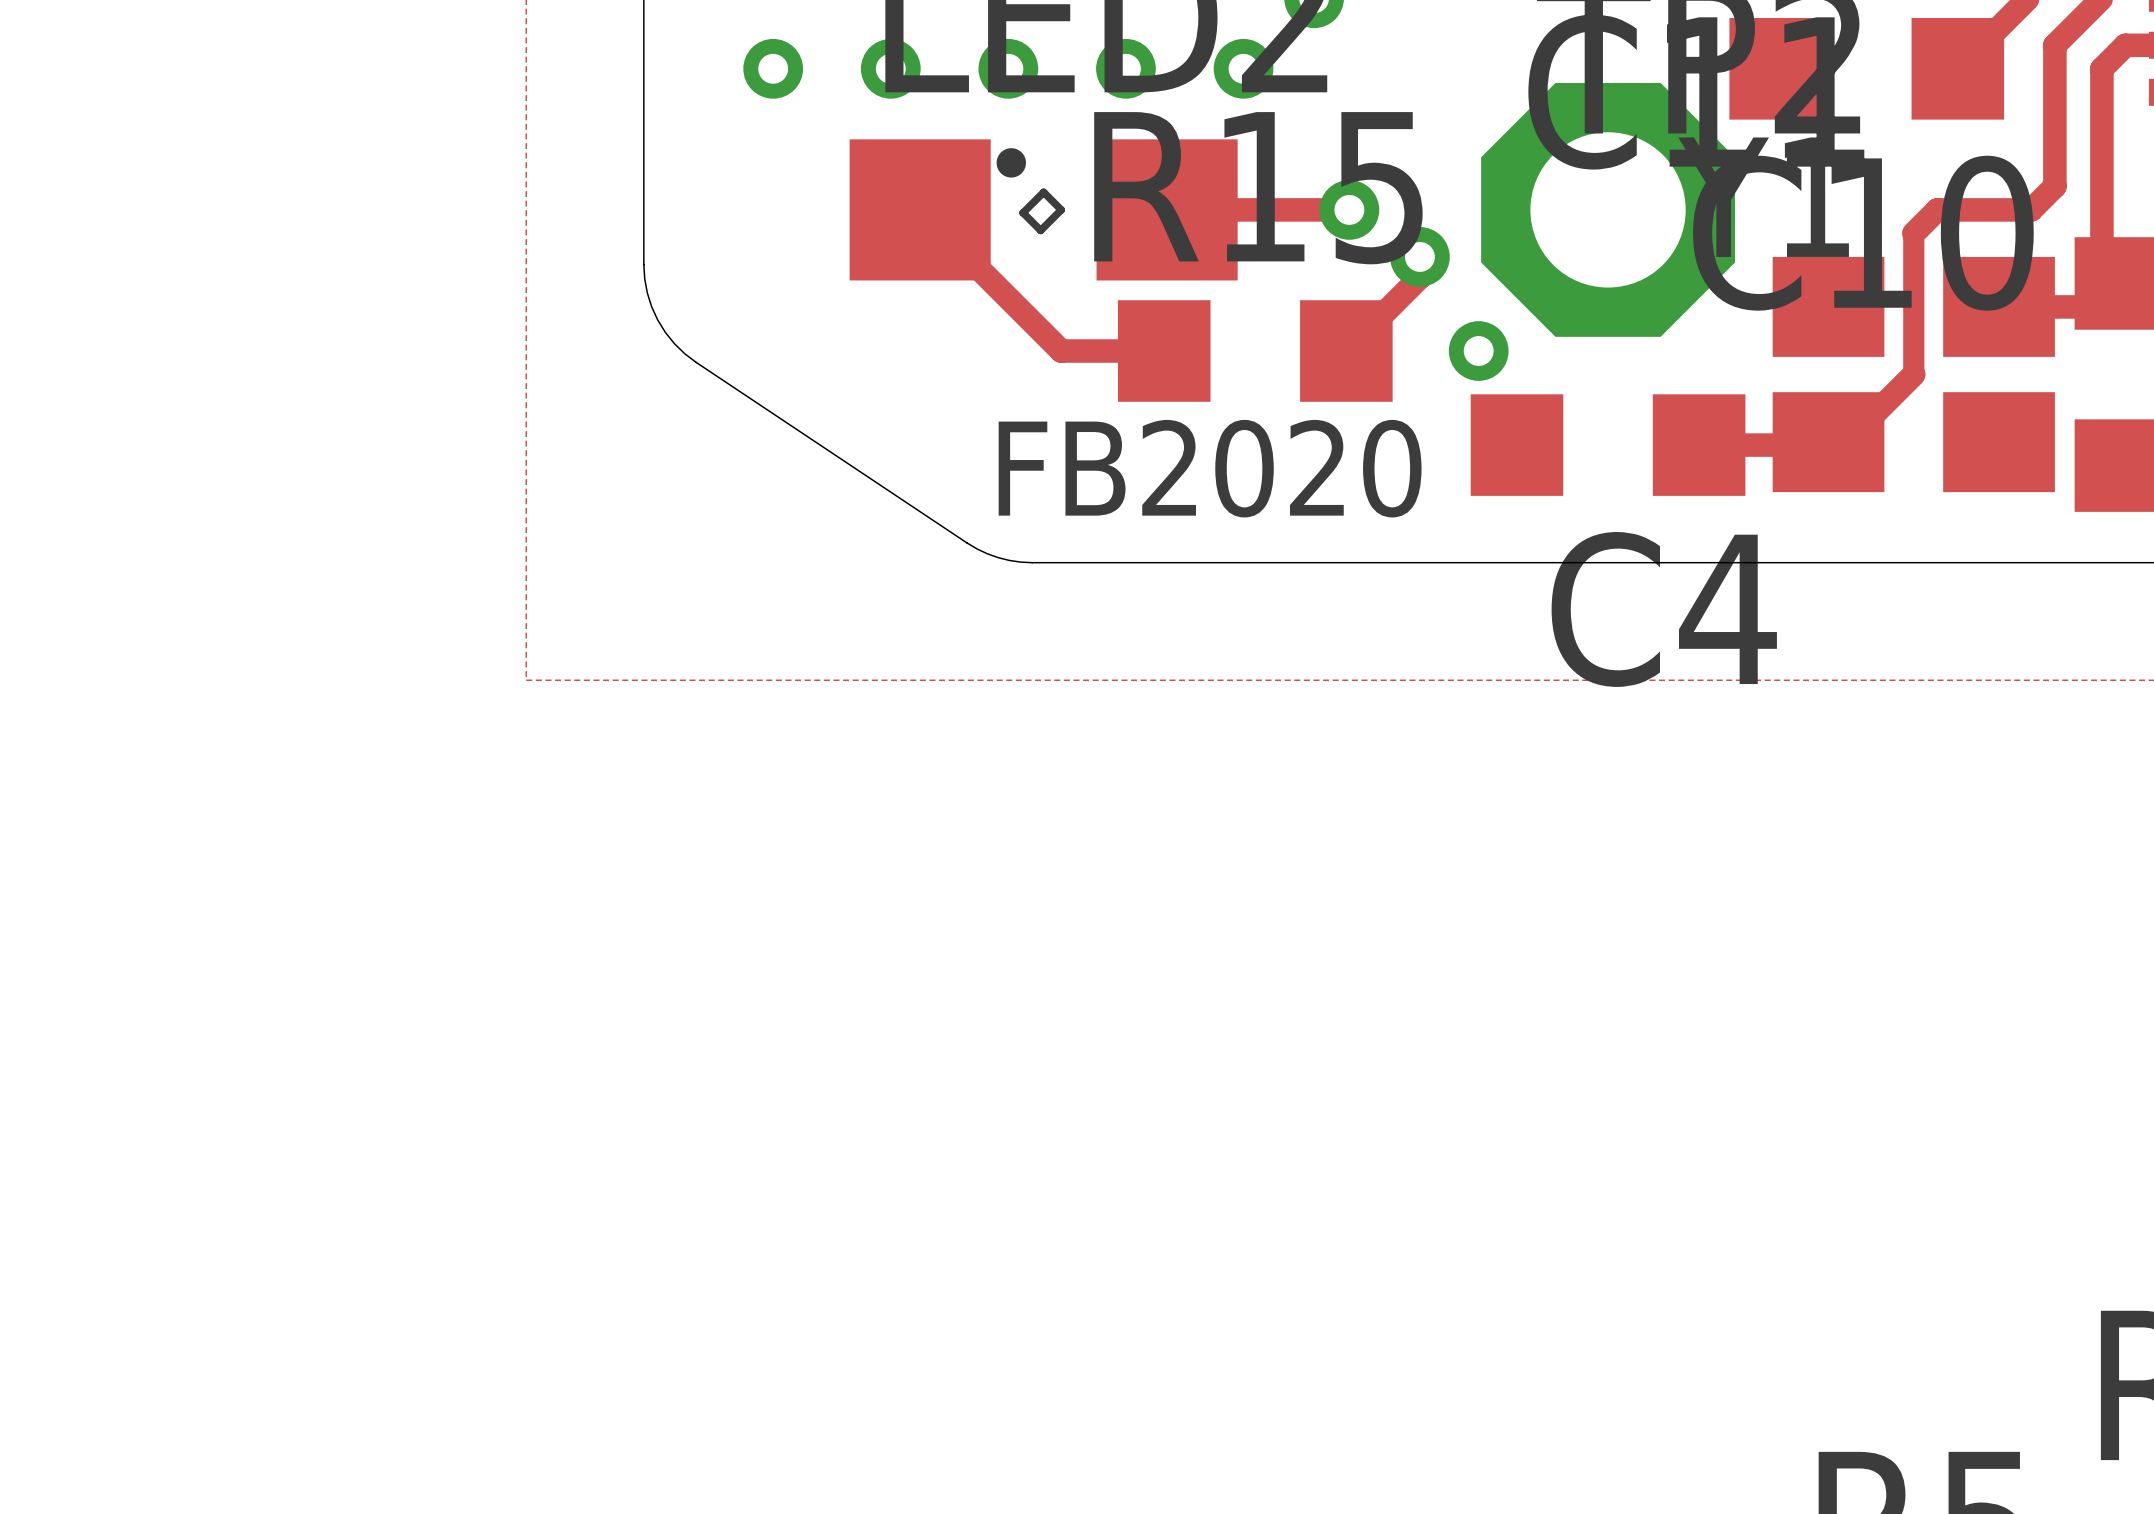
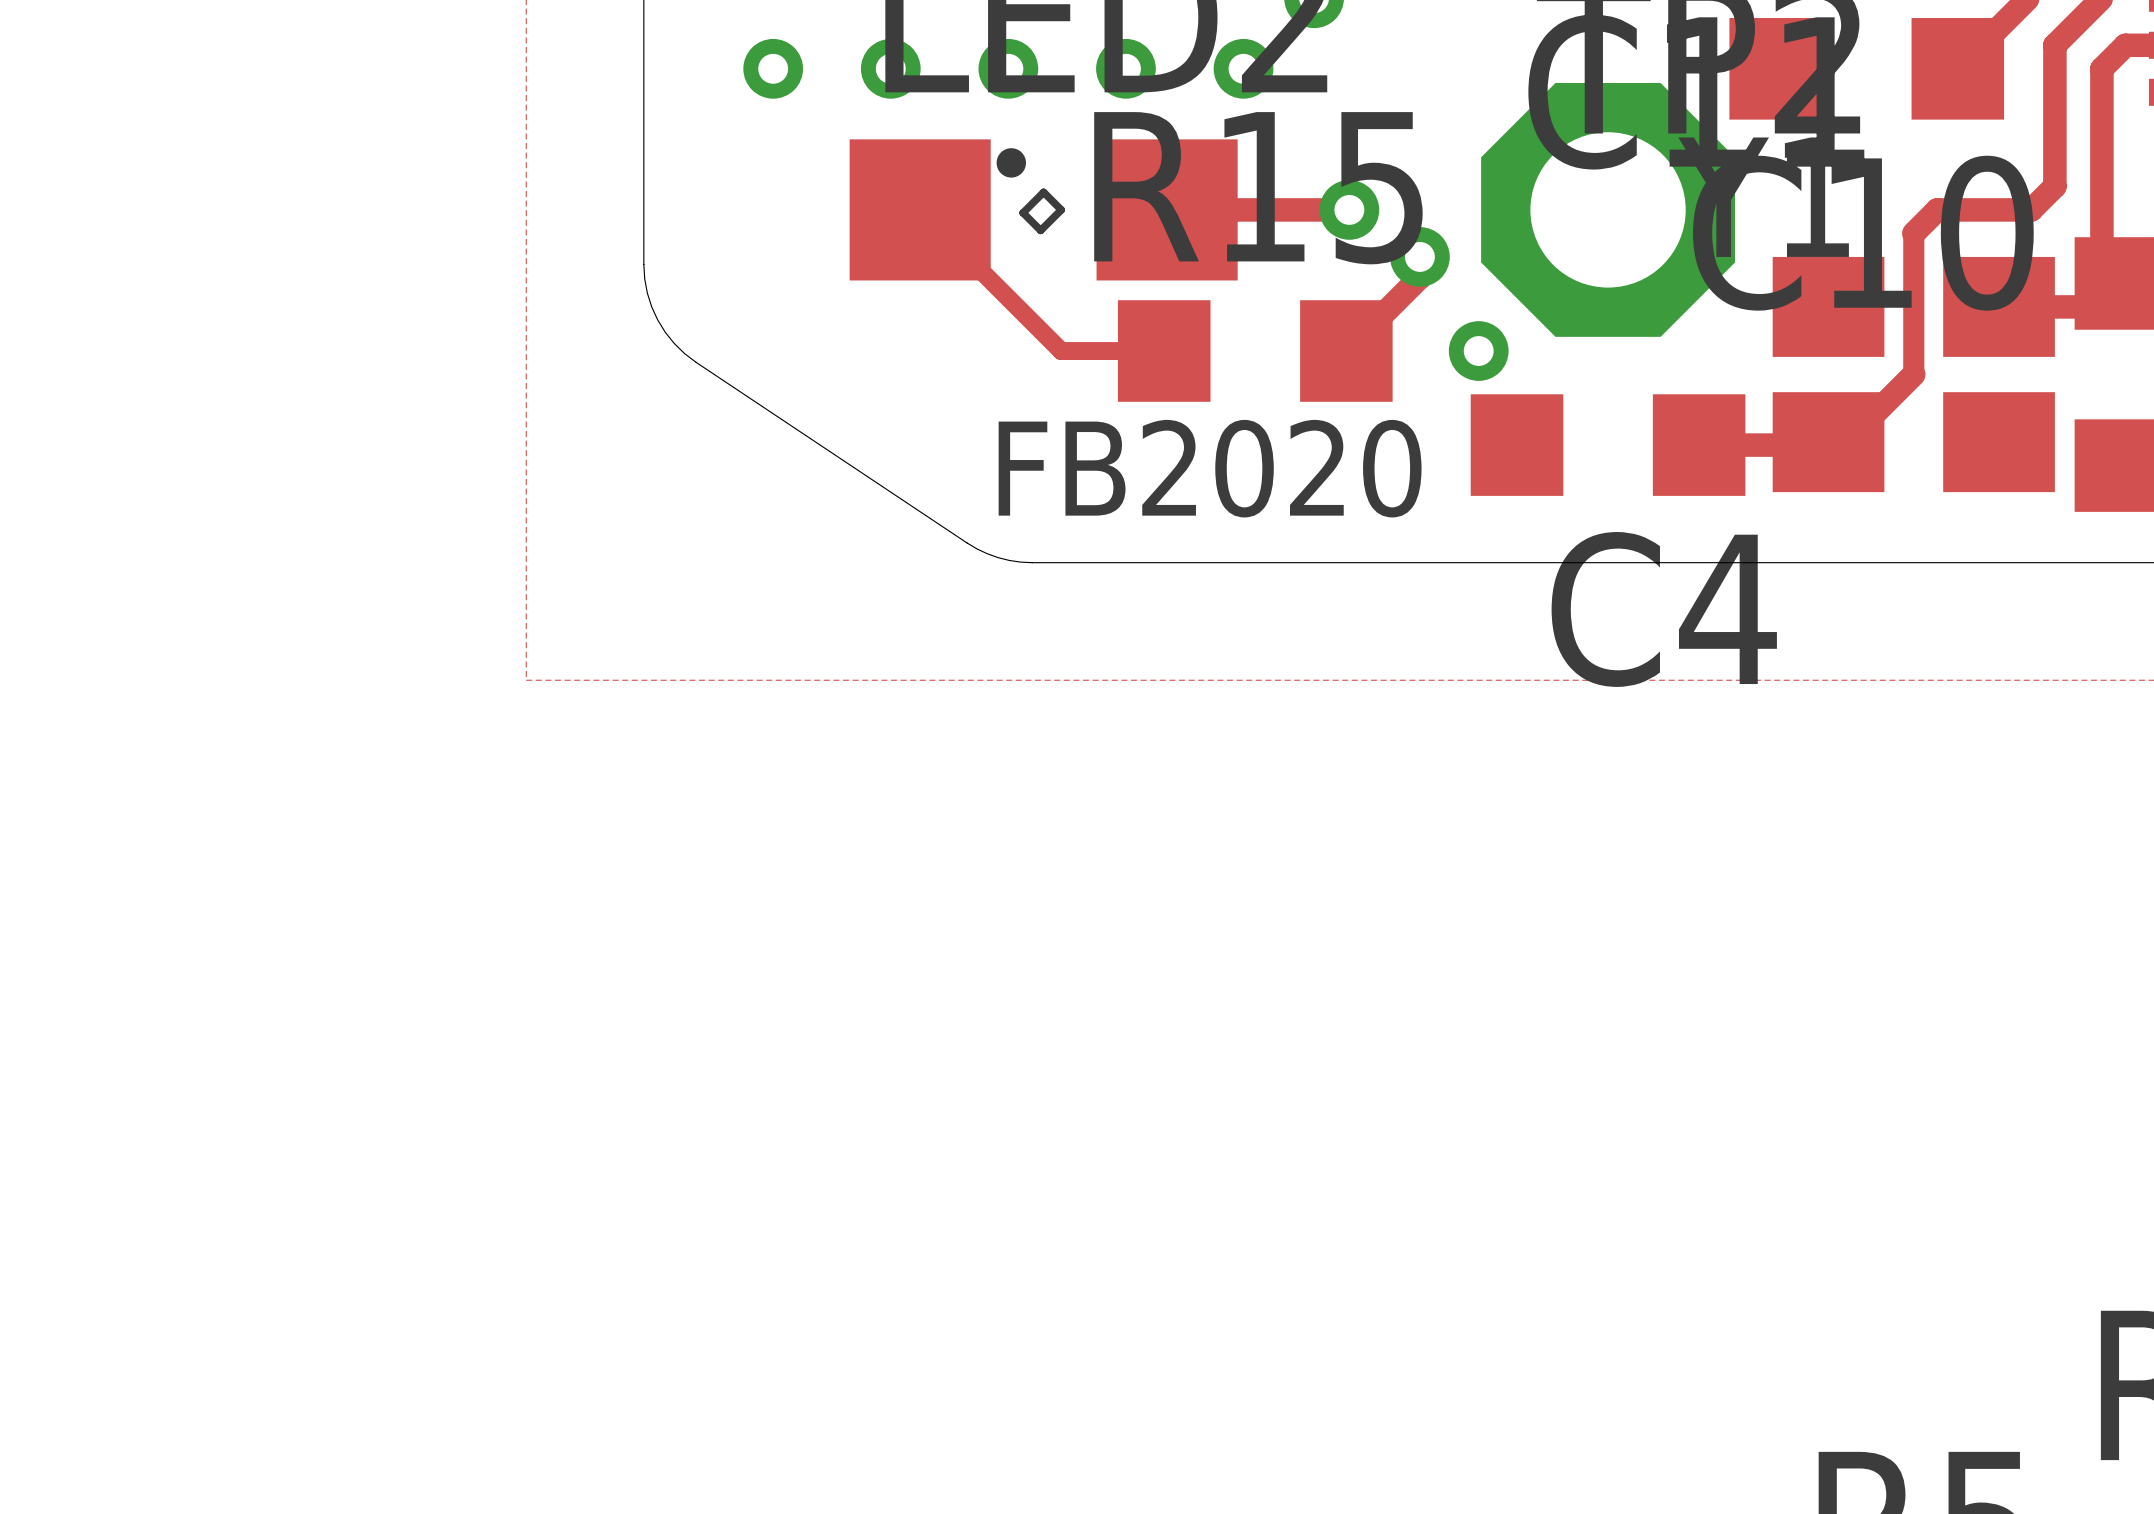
track width: thick (920, 209) (1061, 351) (1164, 351) -> thin (920, 209) (1061, 351) (1164, 351)

